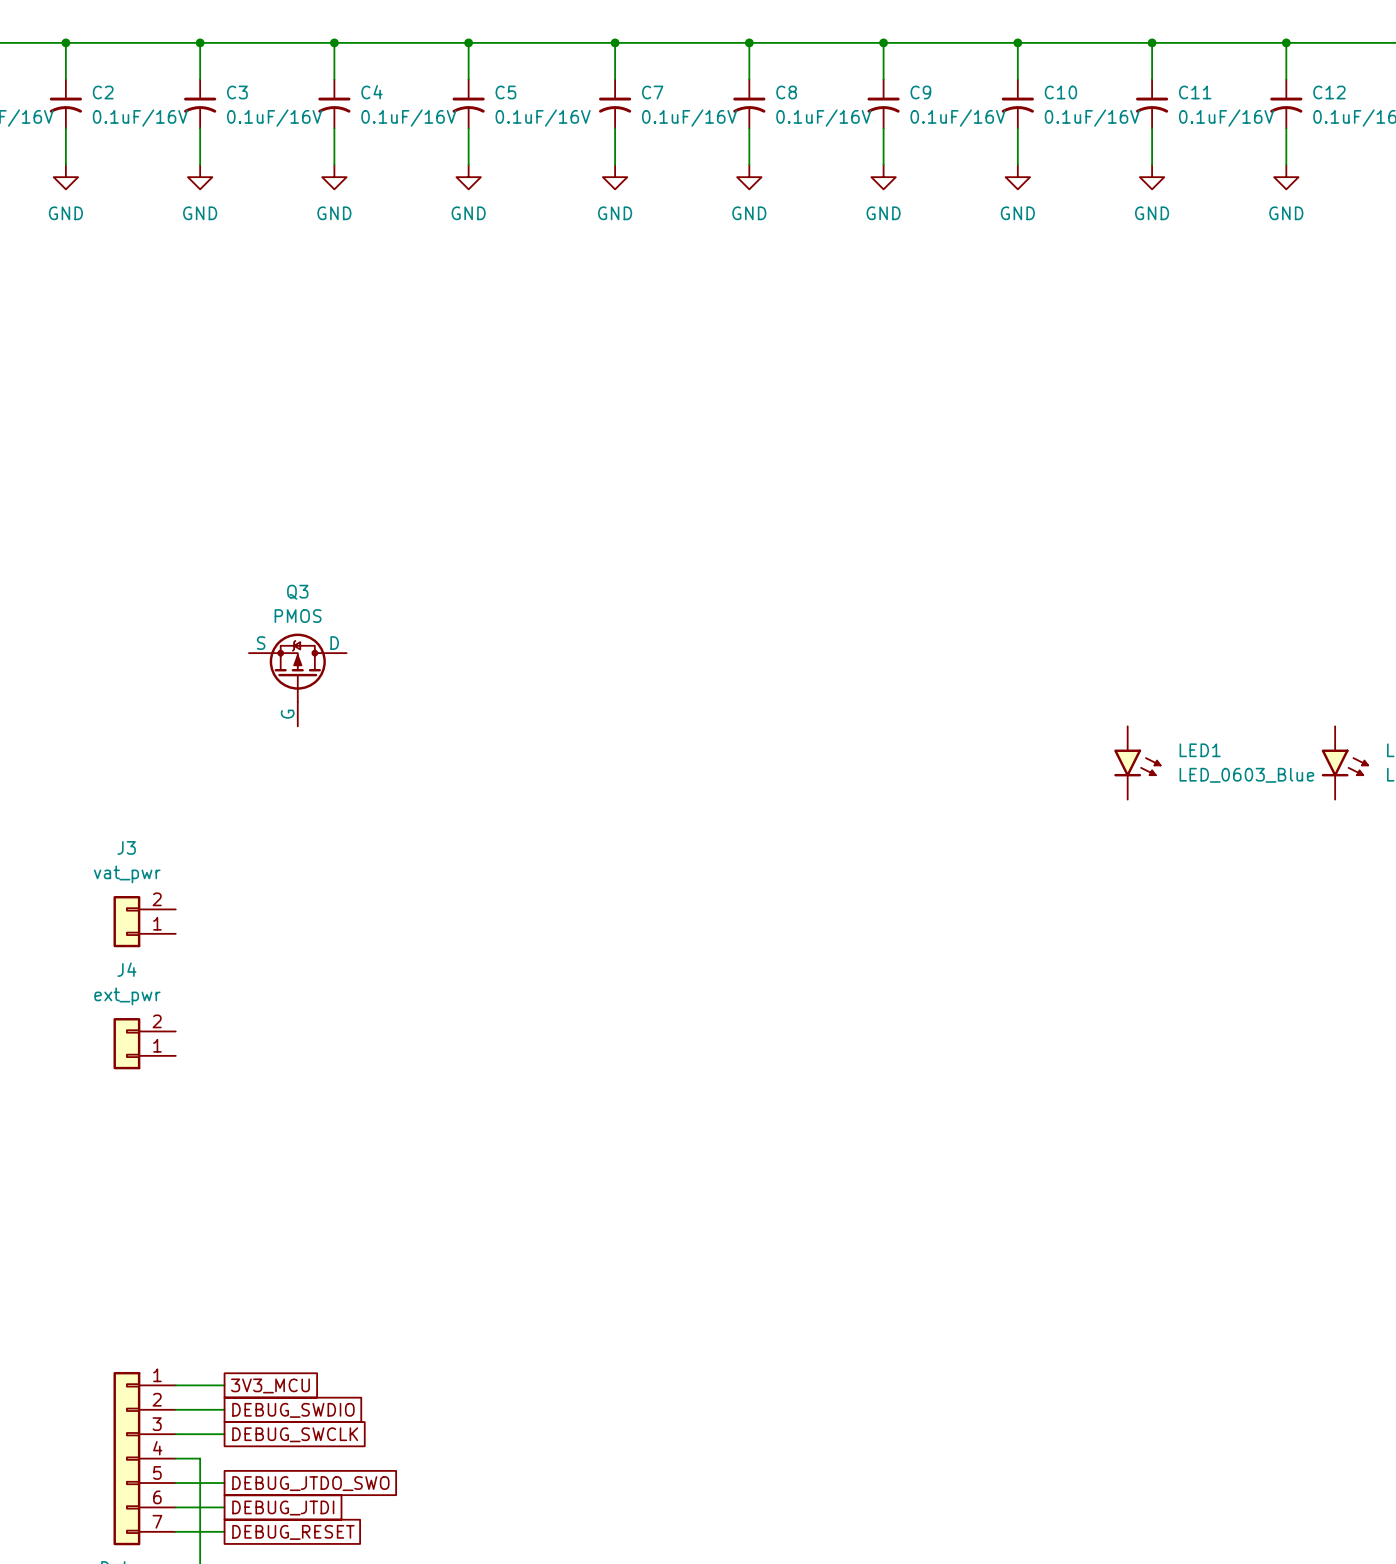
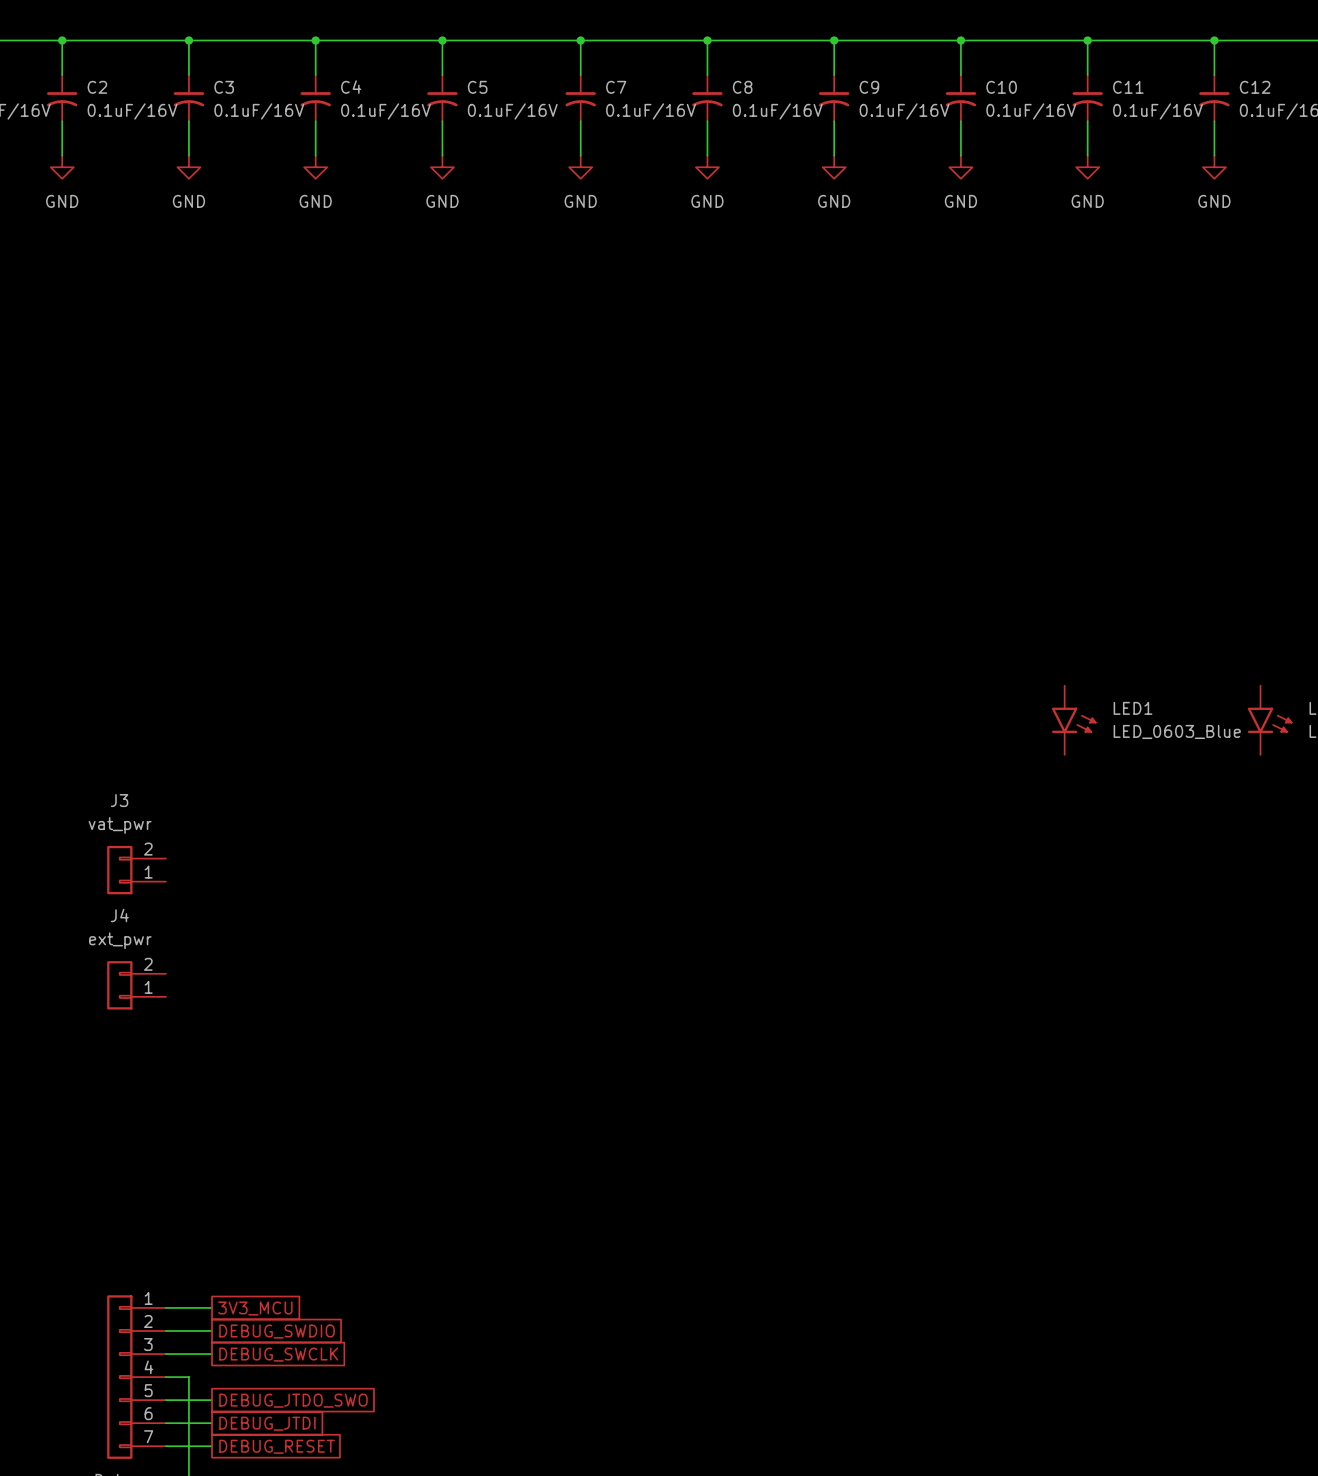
Q3: PMOS (297, 679) -> none

